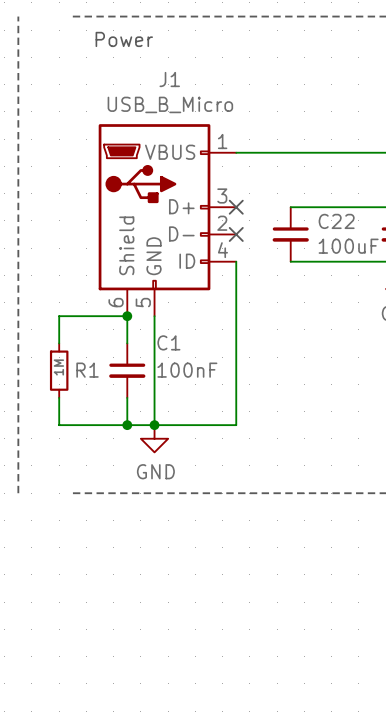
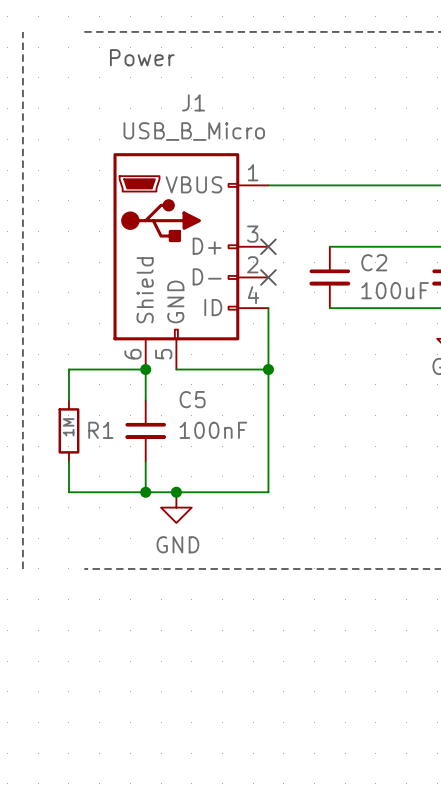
C22 name: C22 (336, 221) -> C2 (374, 262)
wire: (154, 316) (154, 425) -> (176, 369) (268, 369)
junction: none -> (268, 369)
C1 name: C1 (168, 342) -> C5 (192, 399)

